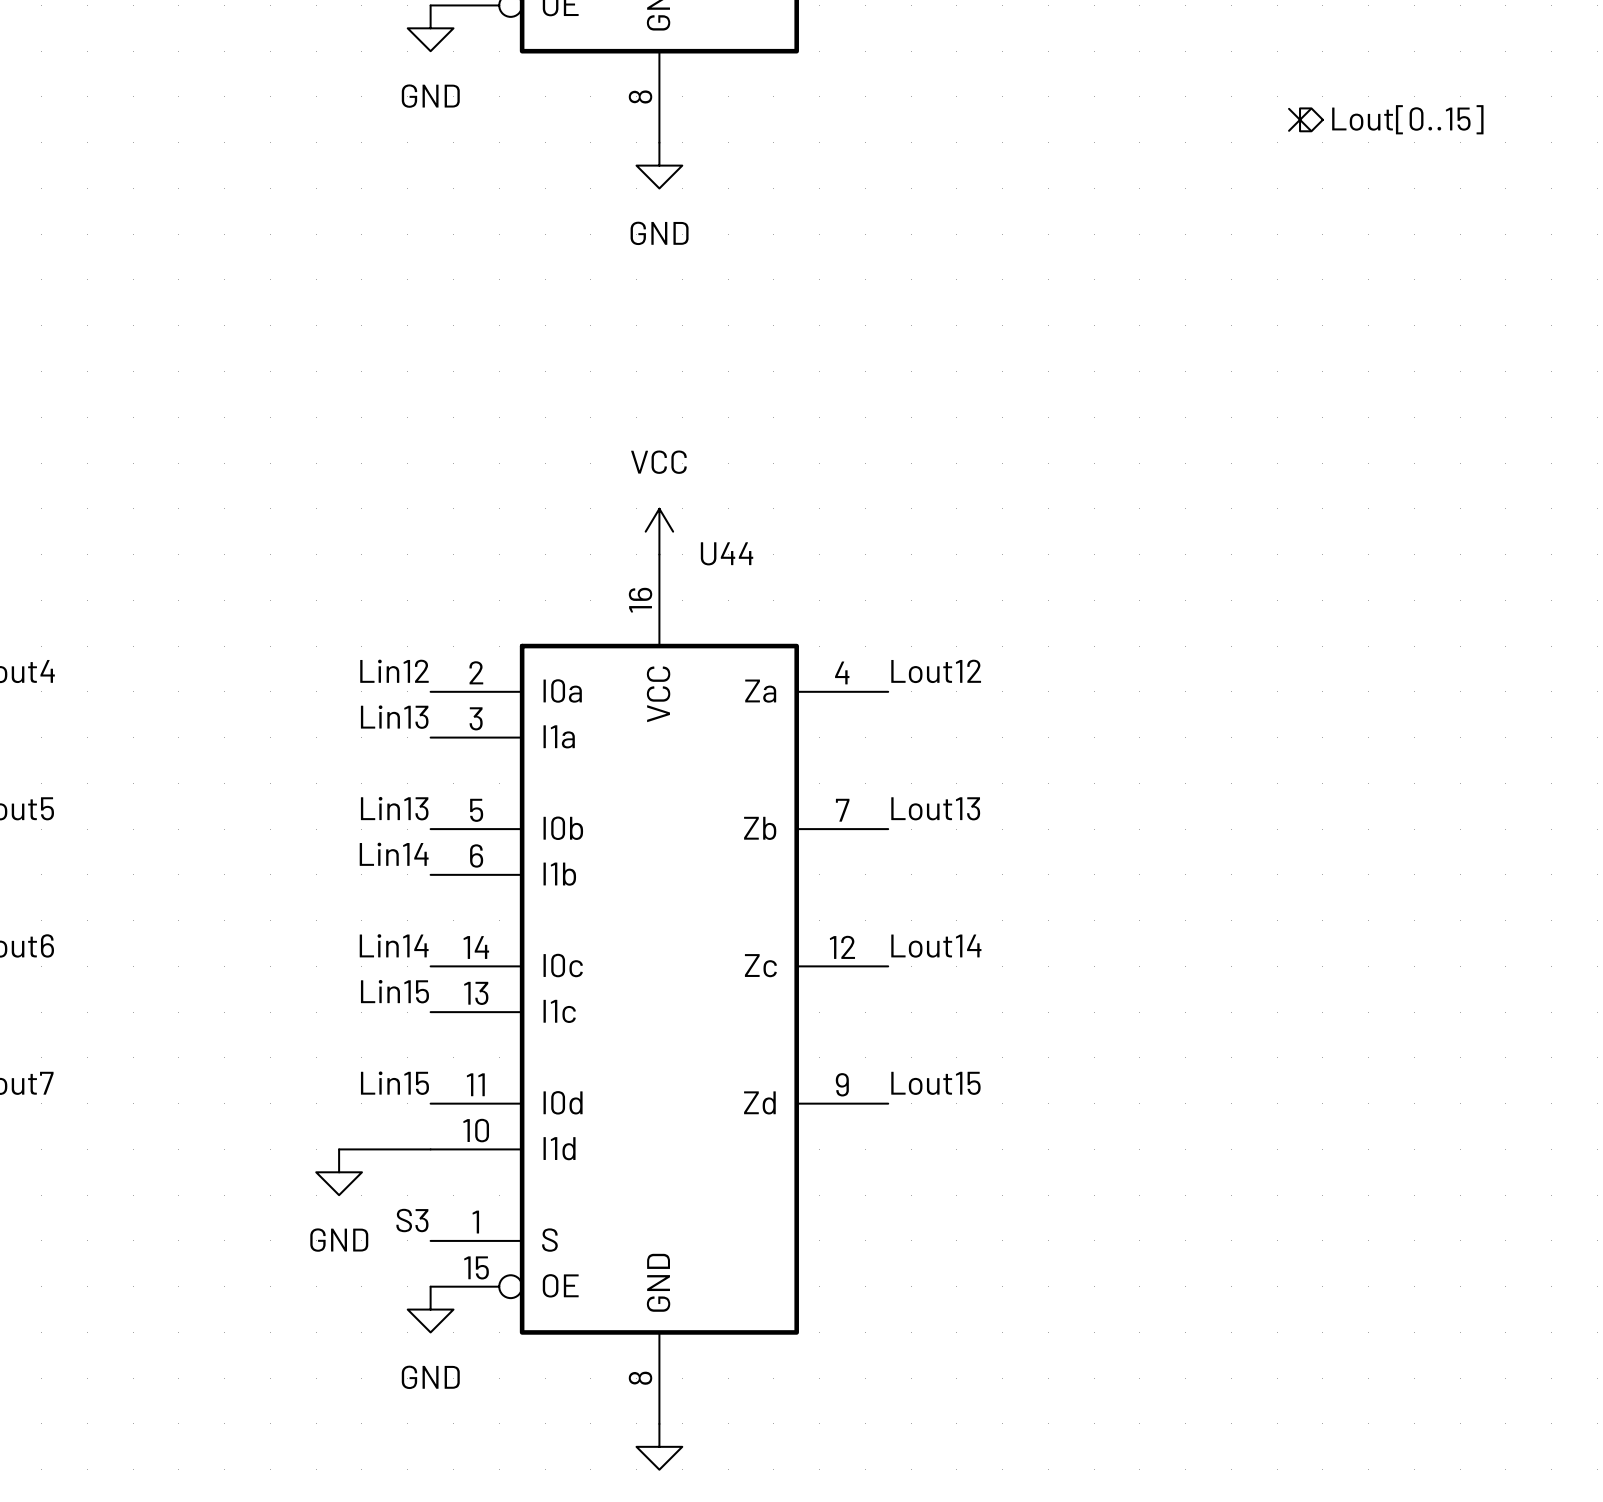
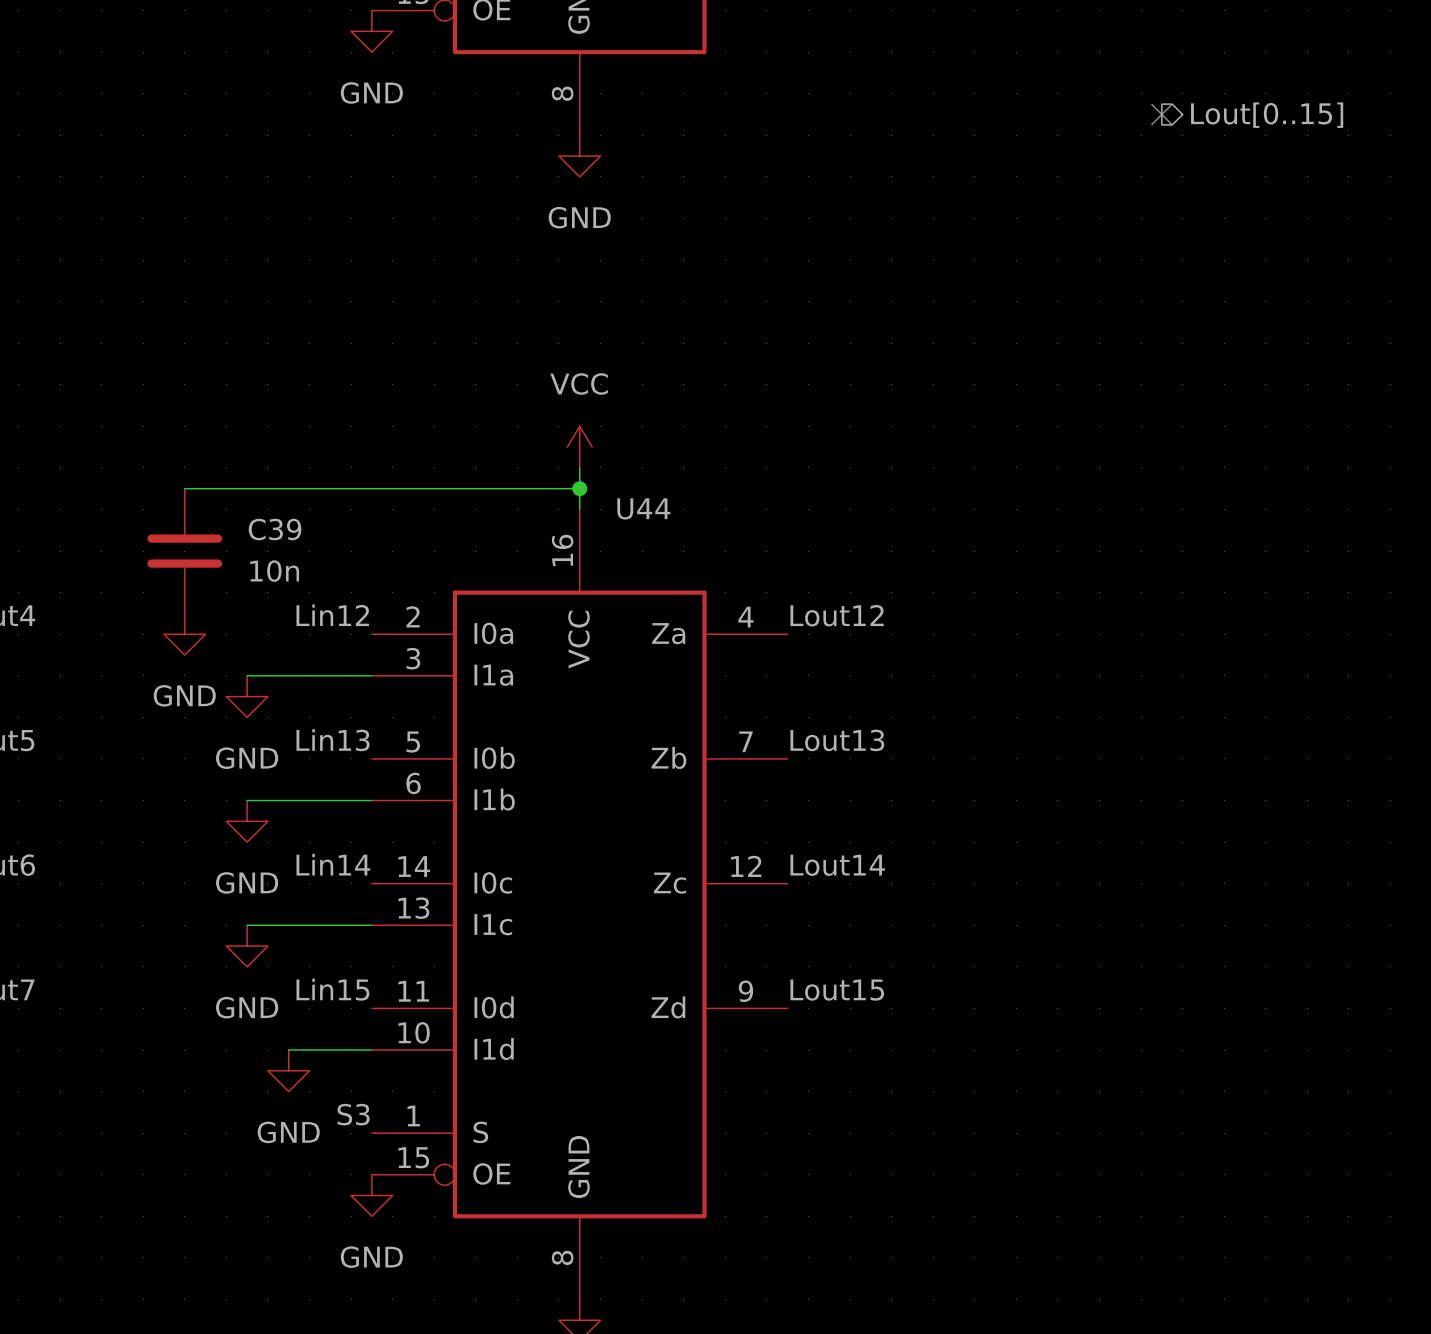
wire: none -> (184, 488) (579, 488)
power symbol position: VCC (659, 531) -> VCC (579, 447)
junction: none -> (579, 488)
C39: none -> 10n (184, 551)
power symbol: none -> GND (184, 634)
label: Lin13 (394, 717) -> none
wire: none -> (247, 675) (371, 675)
power symbol: none -> GND (247, 696)
label: Lin14 (394, 854) -> none
wire: none -> (247, 800) (371, 800)
power symbol: none -> GND (247, 821)
label: Lin15 (394, 991) -> none
wire: none -> (247, 925) (371, 925)
power symbol: none -> GND (247, 946)

